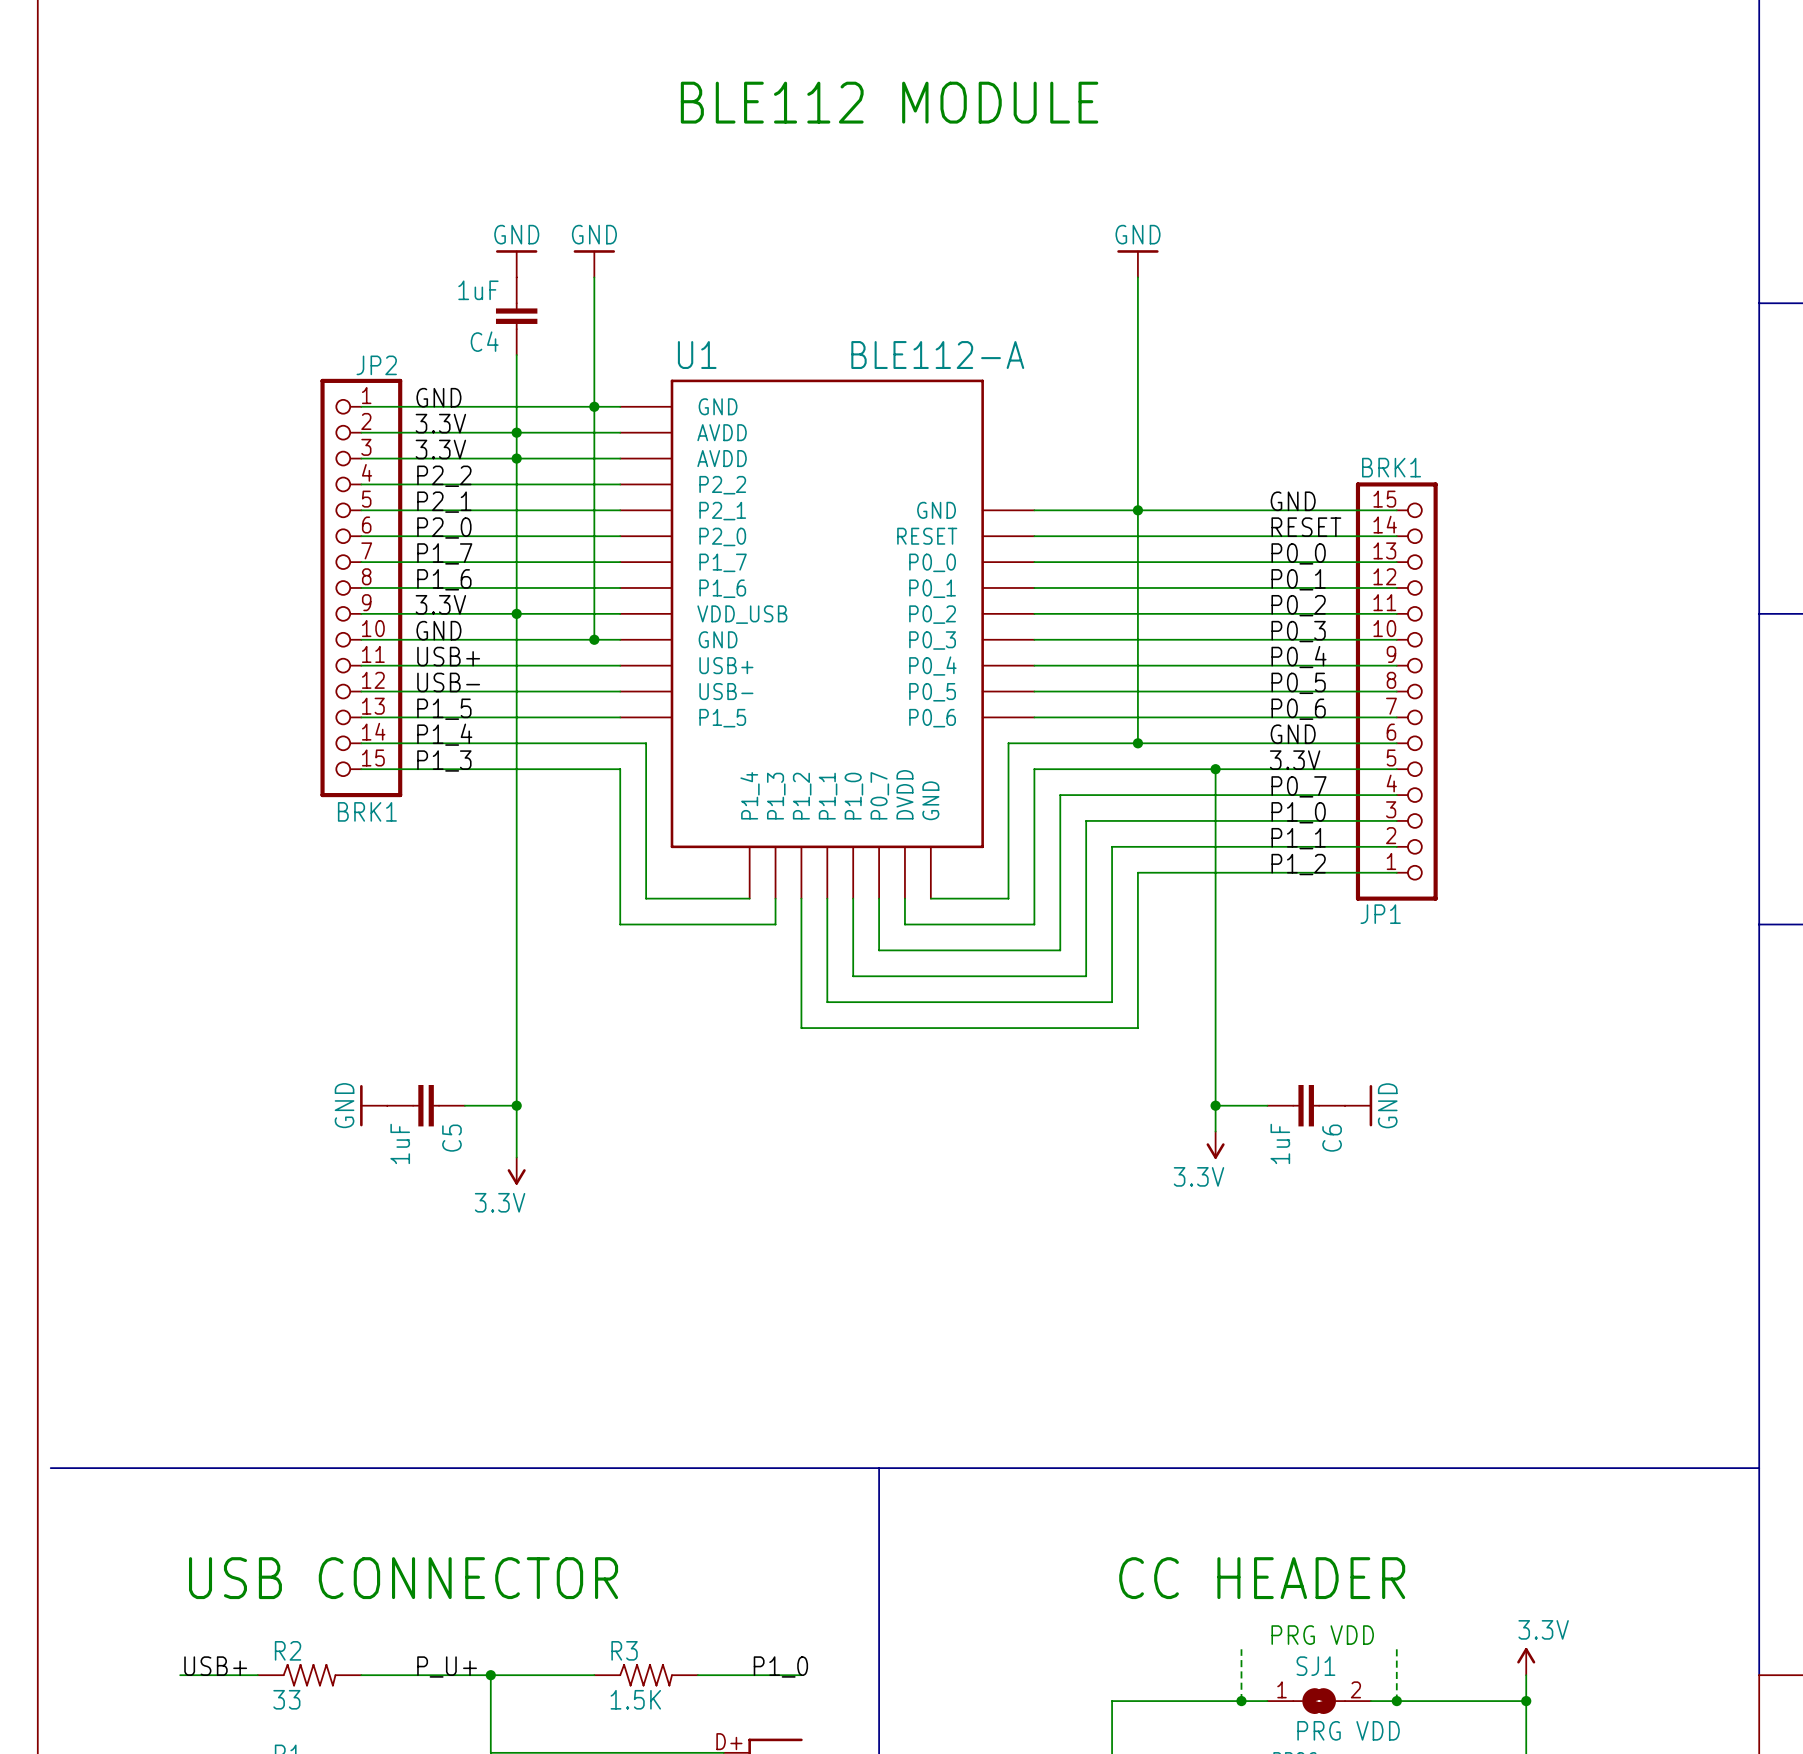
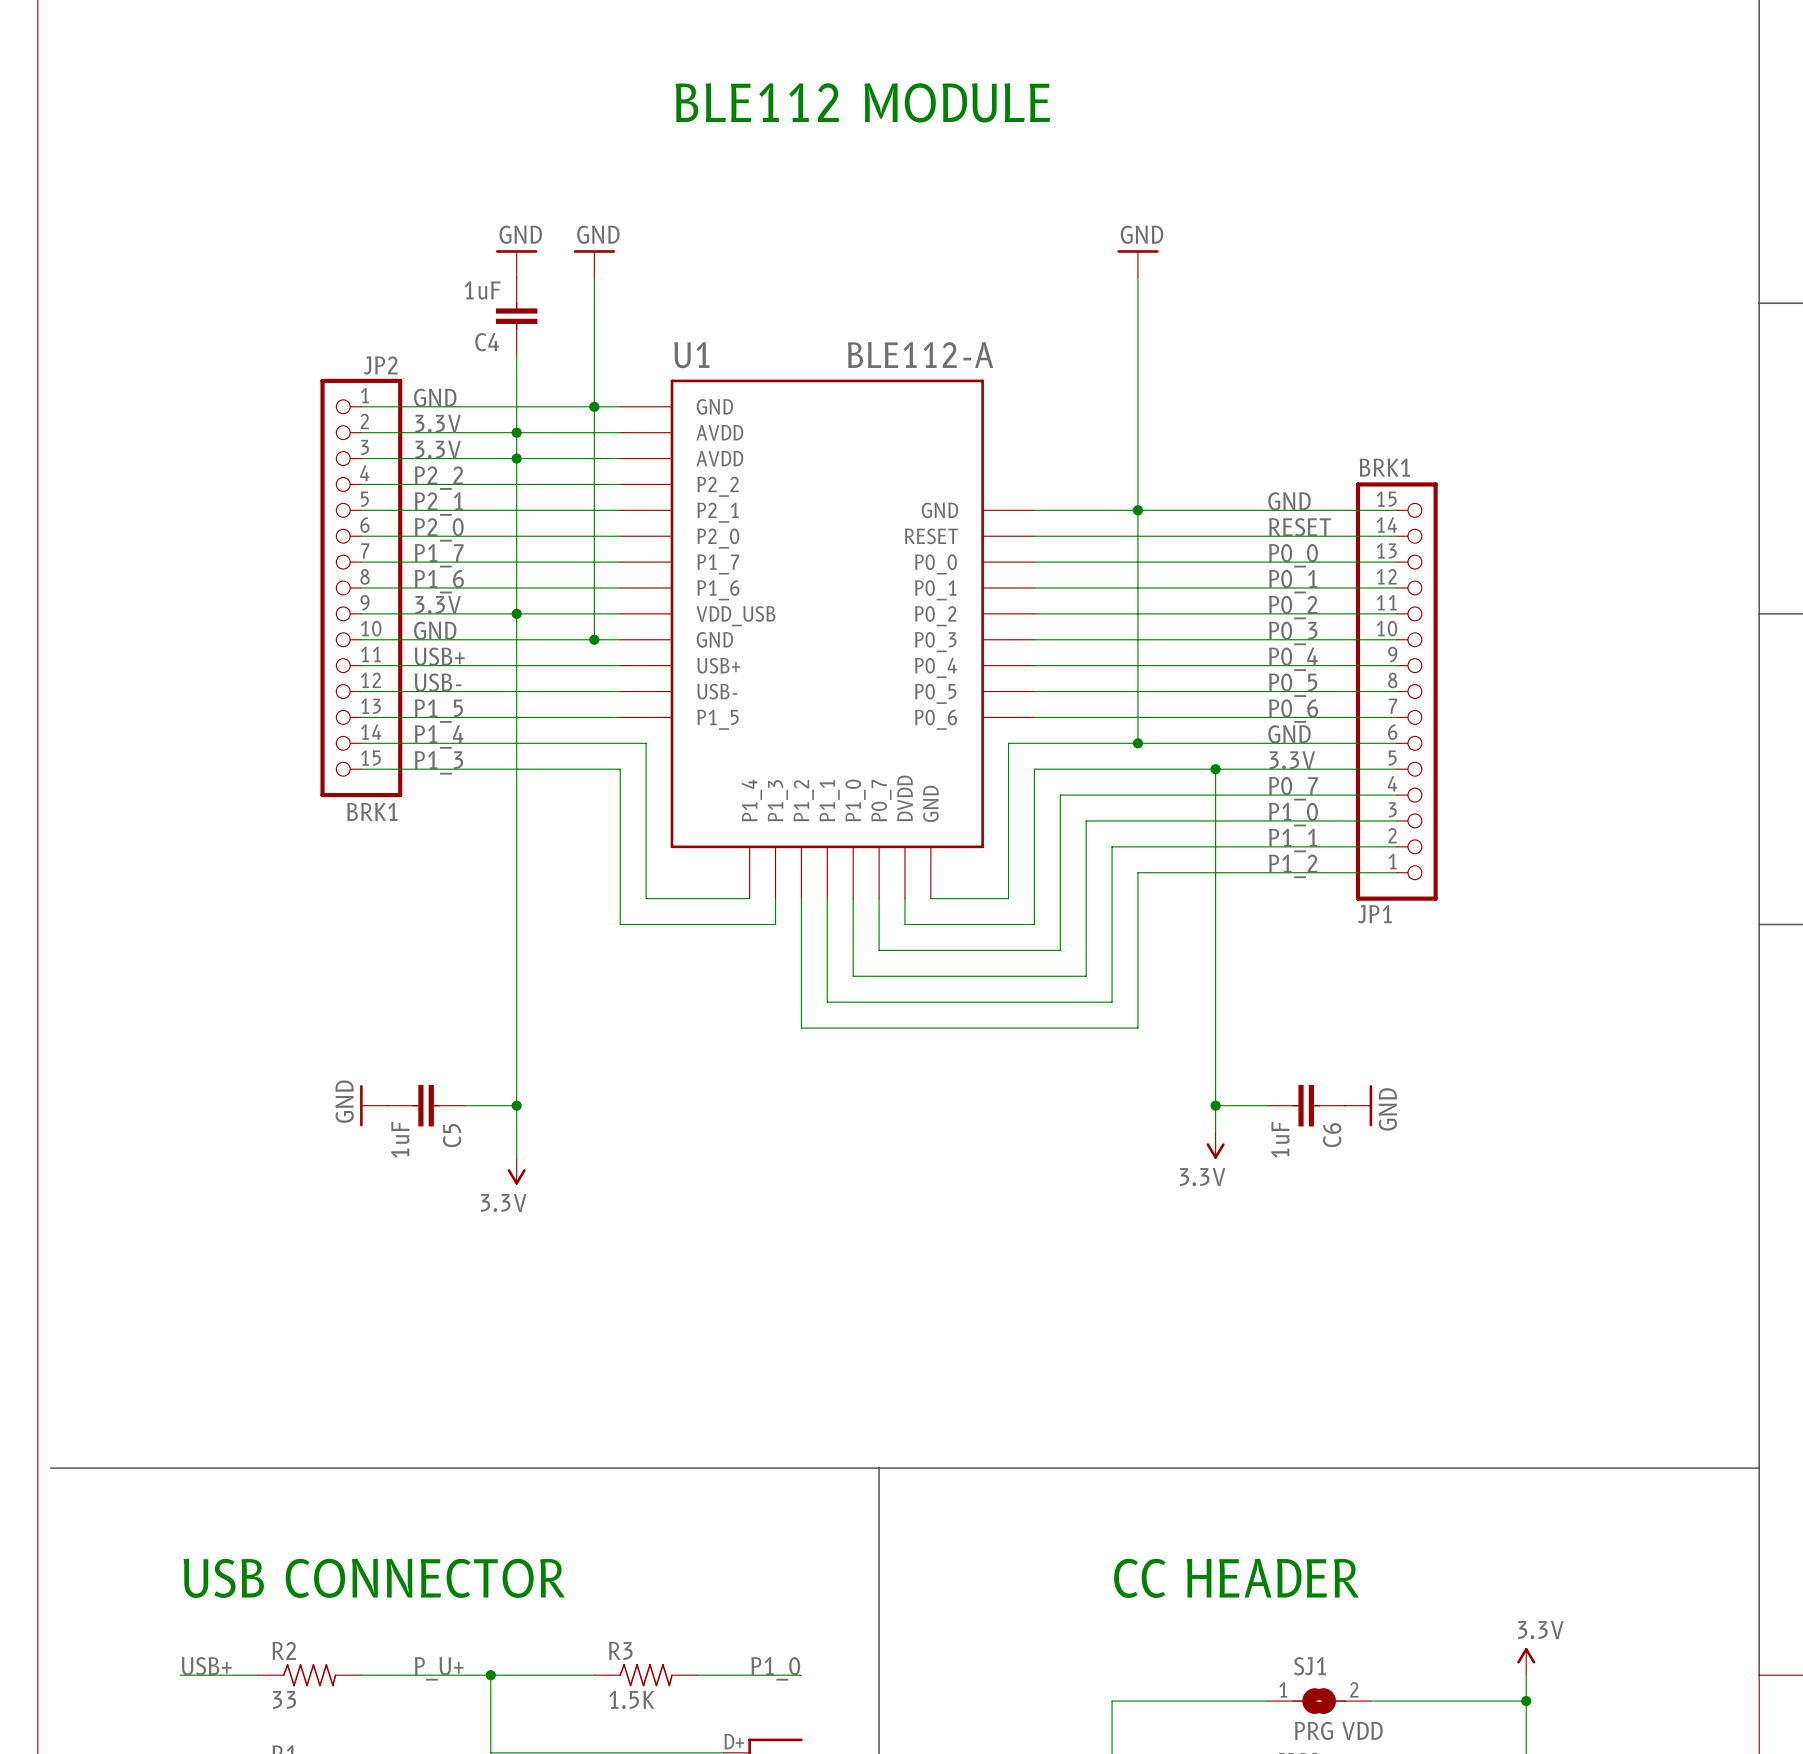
text: PRG VDD (1322, 1635) -> none
wire: (1241, 1649) (1241, 1701) -> none
wire: (1396, 1649) (1396, 1701) -> none
junction: (1241, 1701) -> none
junction: (1396, 1701) -> none

